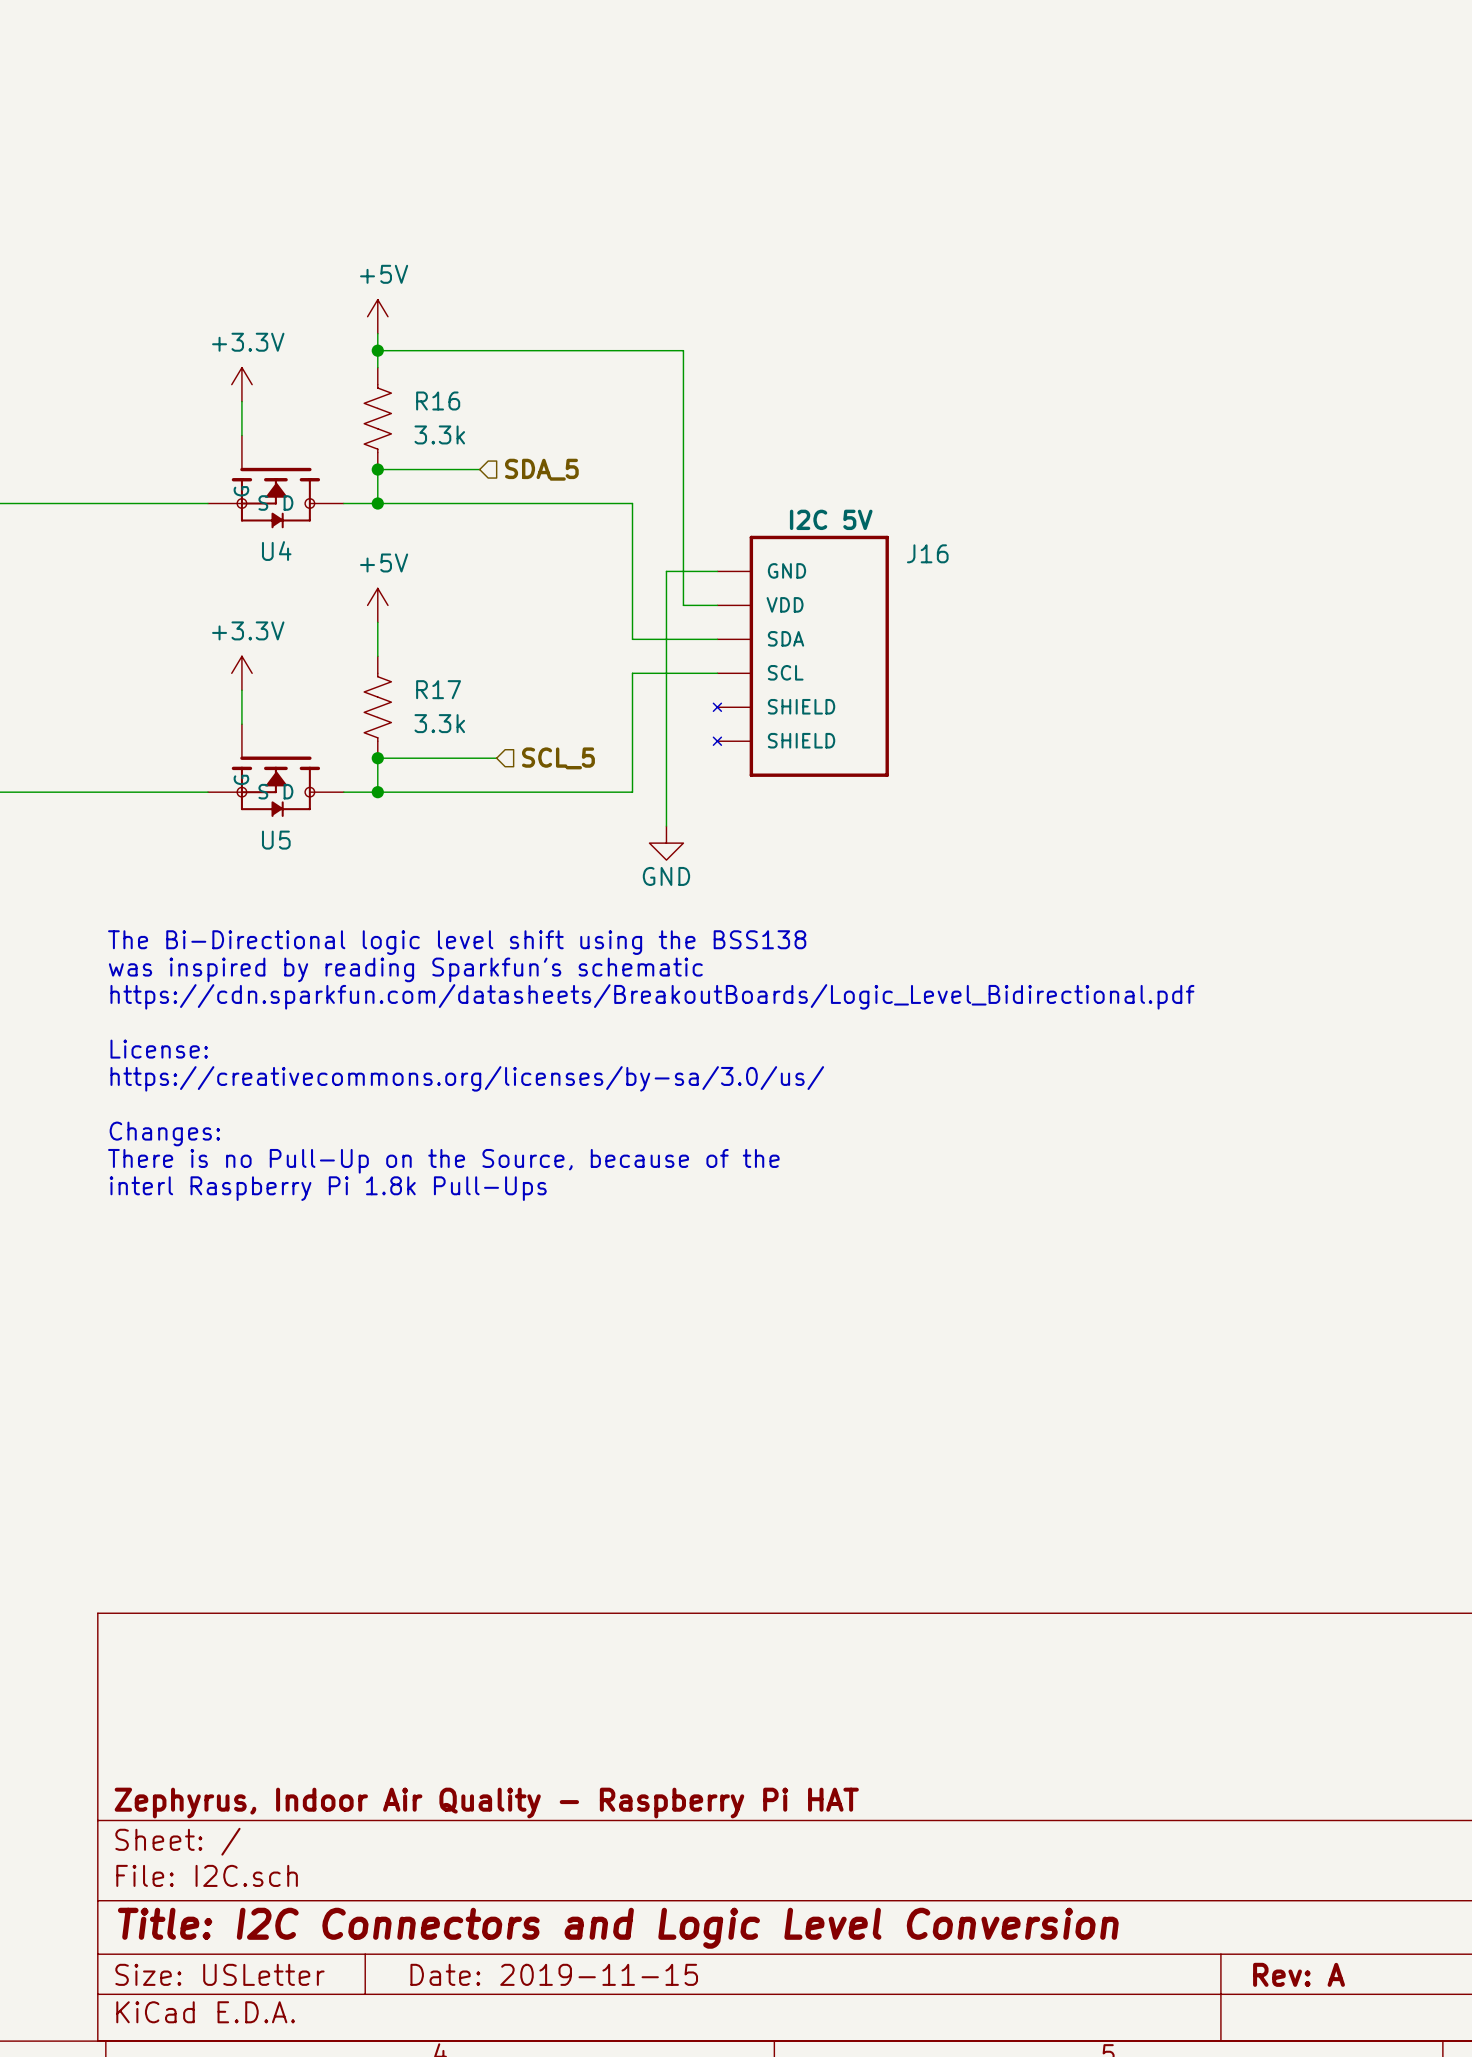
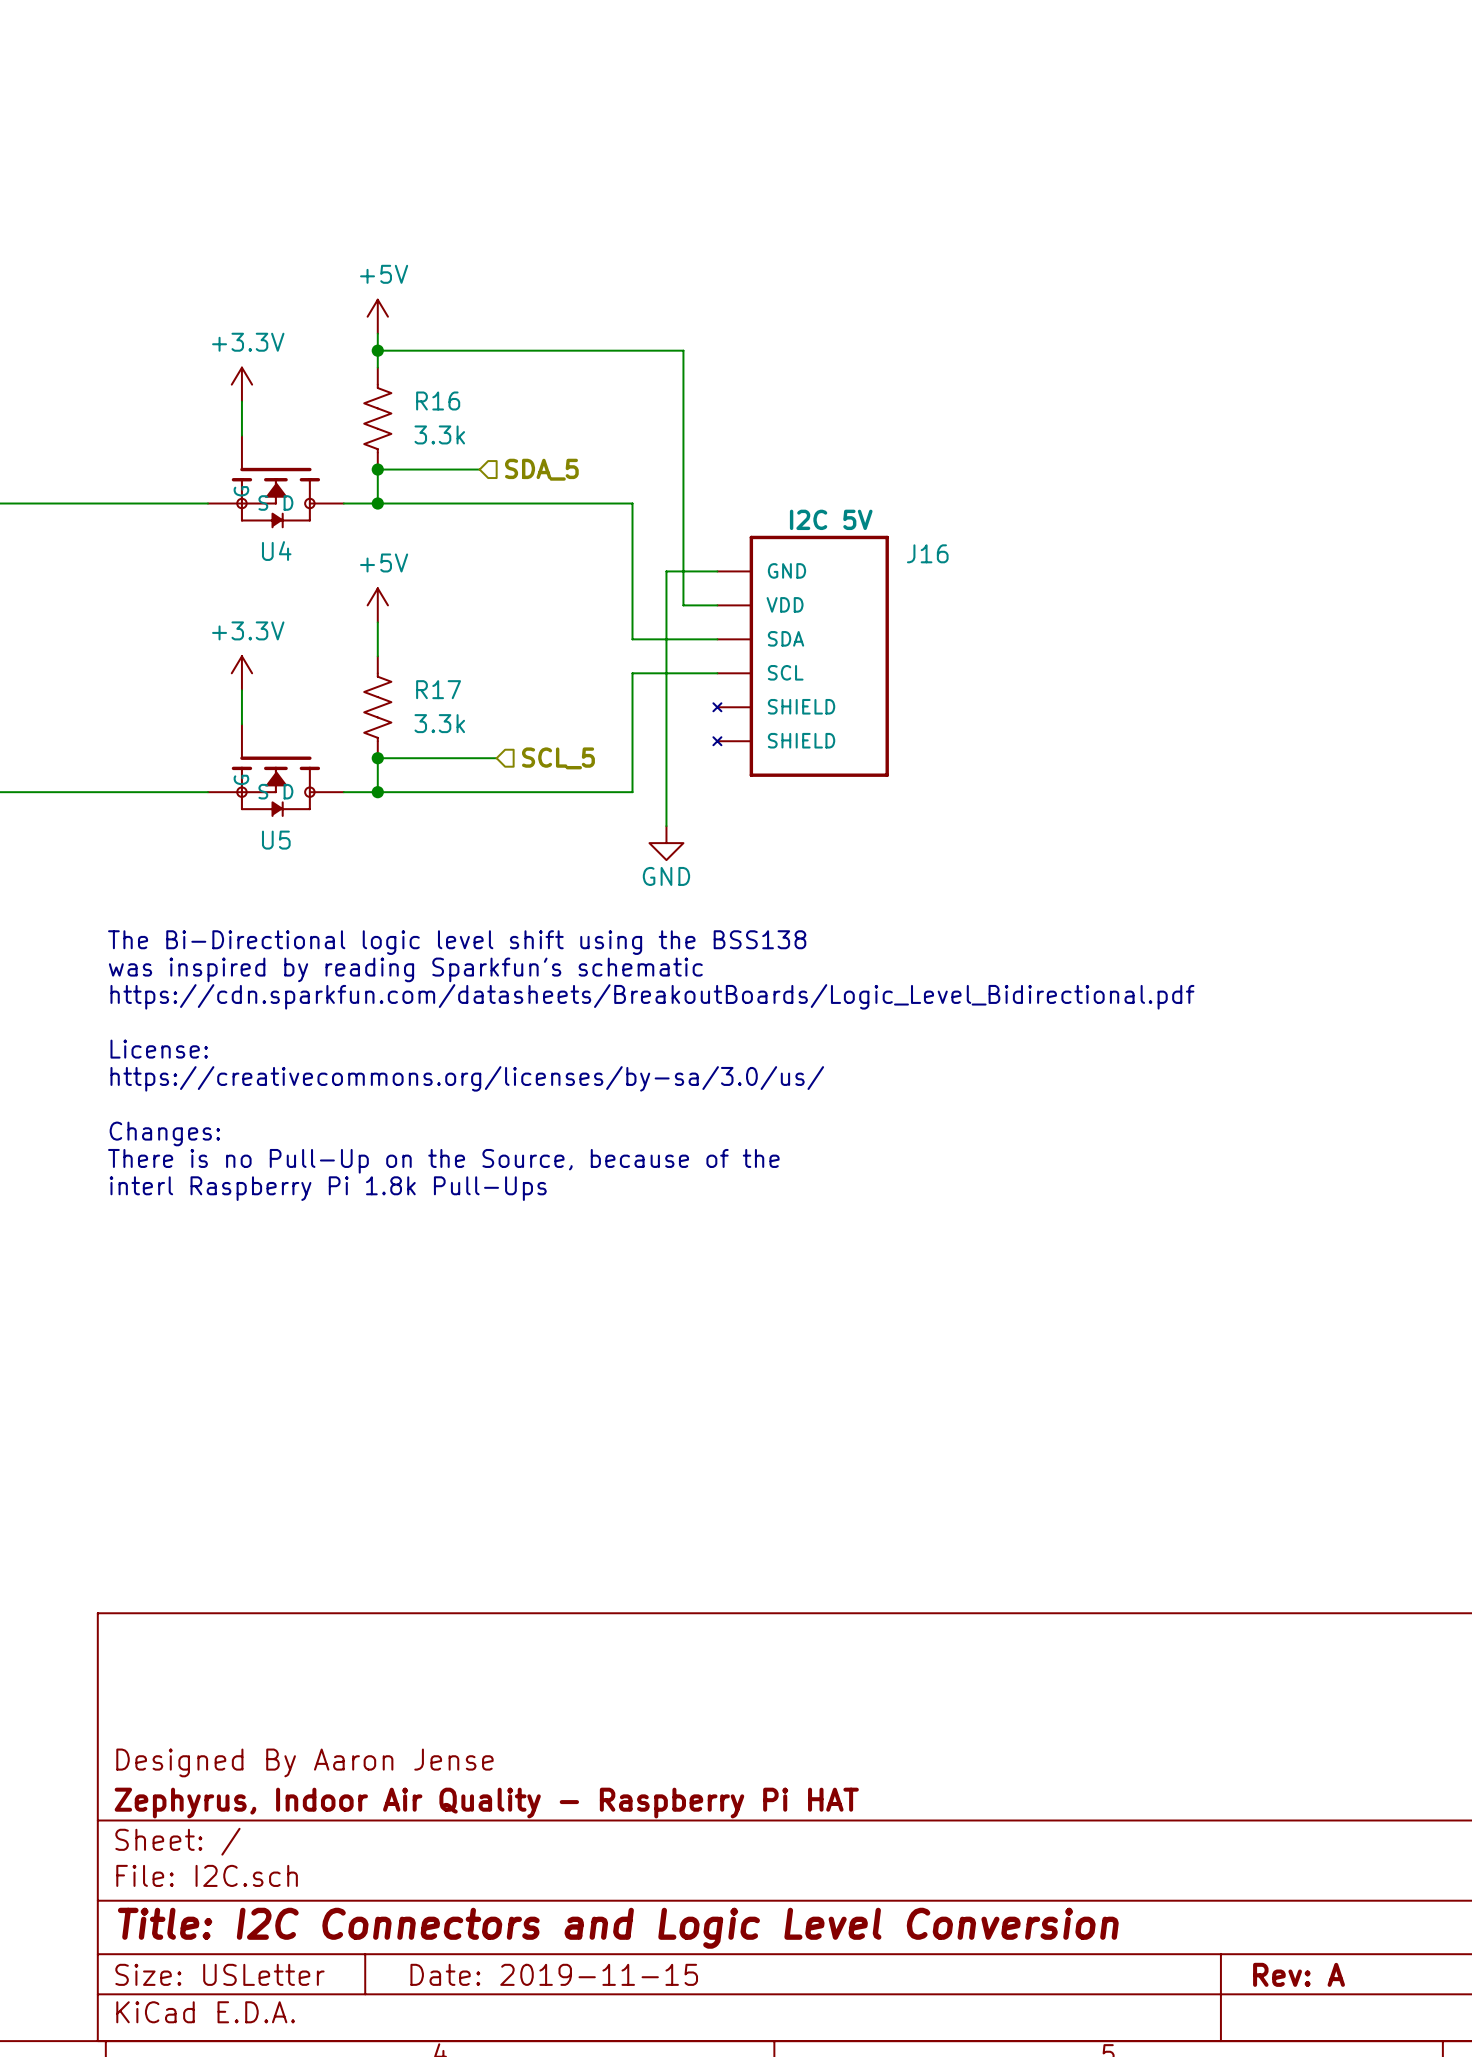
title block: none -> Designed By Aaron Jense (304, 1762)

